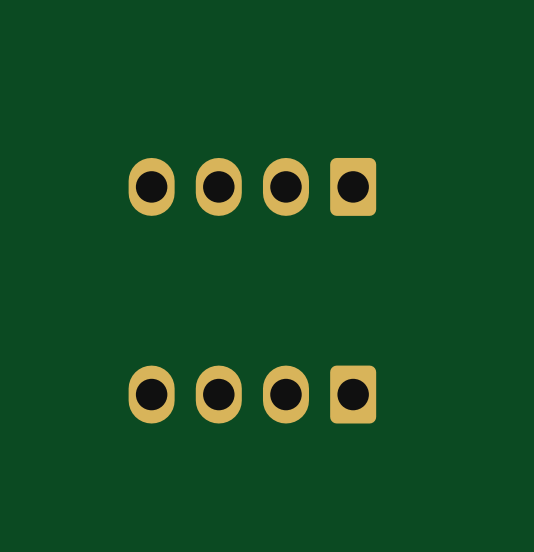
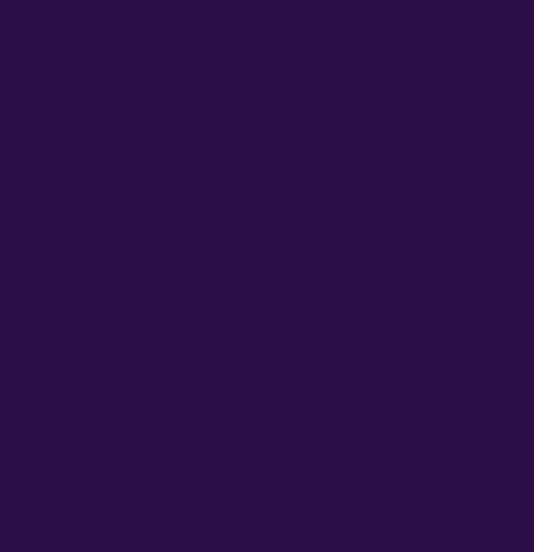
part: (252, 186) -> none
part: (252, 394) -> none

